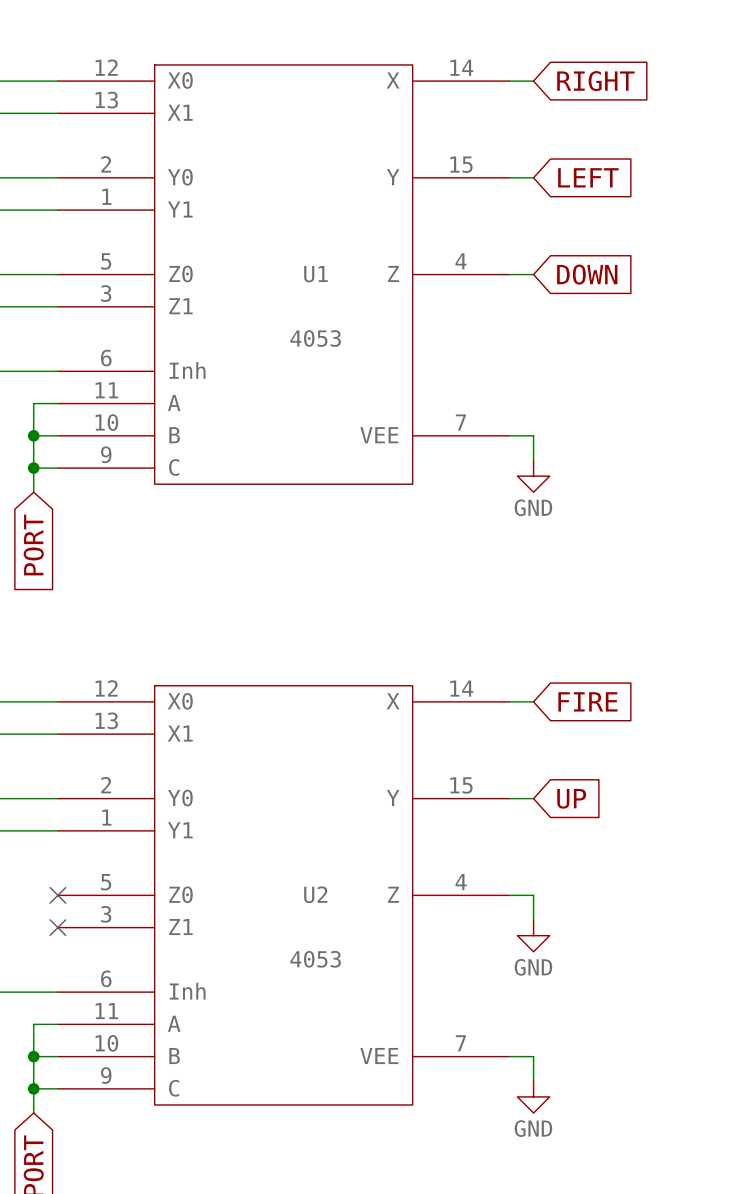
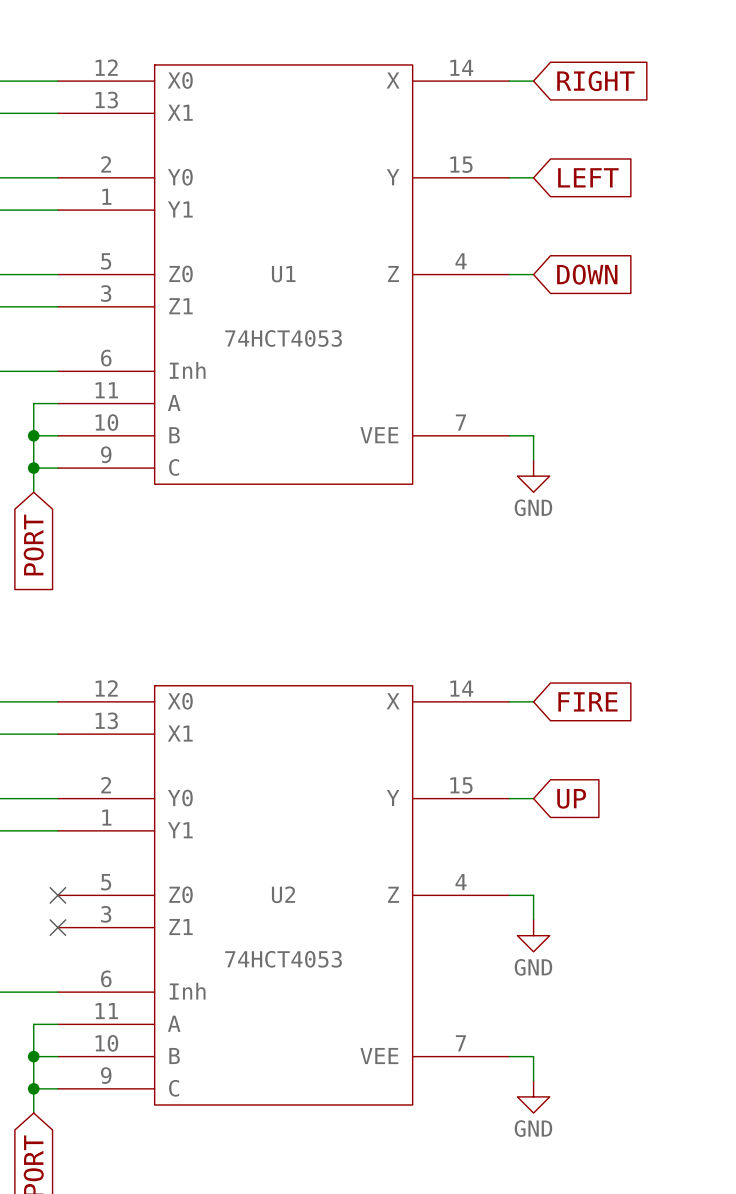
U1 name position: U1 (315, 274) -> U1 (283, 274)
U1 value: 4053 (315, 338) -> 74HCT4053 (283, 338)
U2 name position: U2 (315, 894) -> U2 (283, 894)
U2 value: 4053 (315, 959) -> 74HCT4053 (283, 959)

